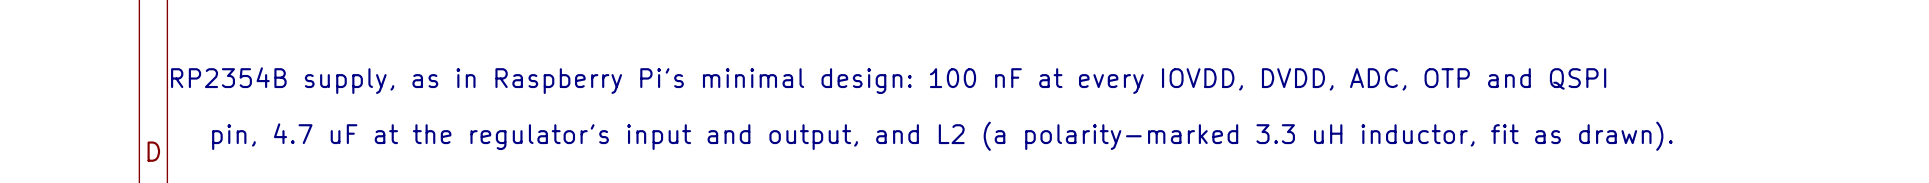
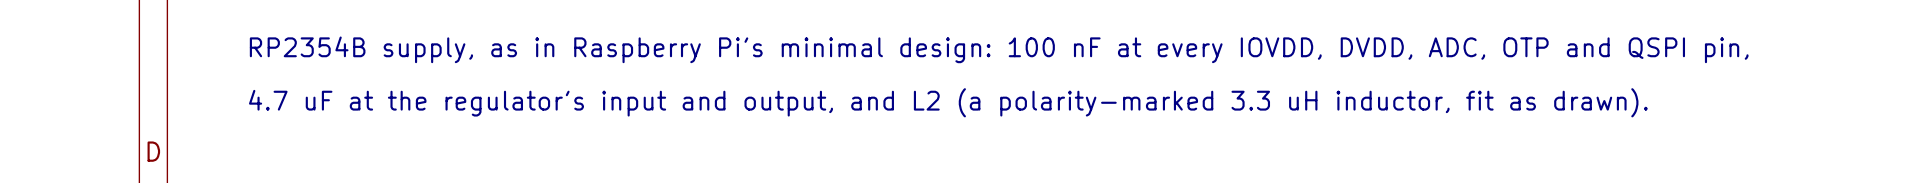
text: RP2354B supply, as in Raspberry Pi's minimal design: 100 nF at every IOVDD, DVDD, ADC, OTP and QSPI (888, 80) -> RP2354B supply, as in Raspberry Pi's minimal design: 100 nF at every IOVDD, DVDD, ADC, OTP and QSPI pin, (999, 49)
text: pin, 4.7 uF at the regulator's input and output, and L2 (a polarity-marked 3.3 uH inductor, fit as drawn). (942, 136) -> 4.7 uF at the regulator's input and output, and L2 (a polarity-marked 3.3 uH inductor, fit as drawn). (948, 102)

